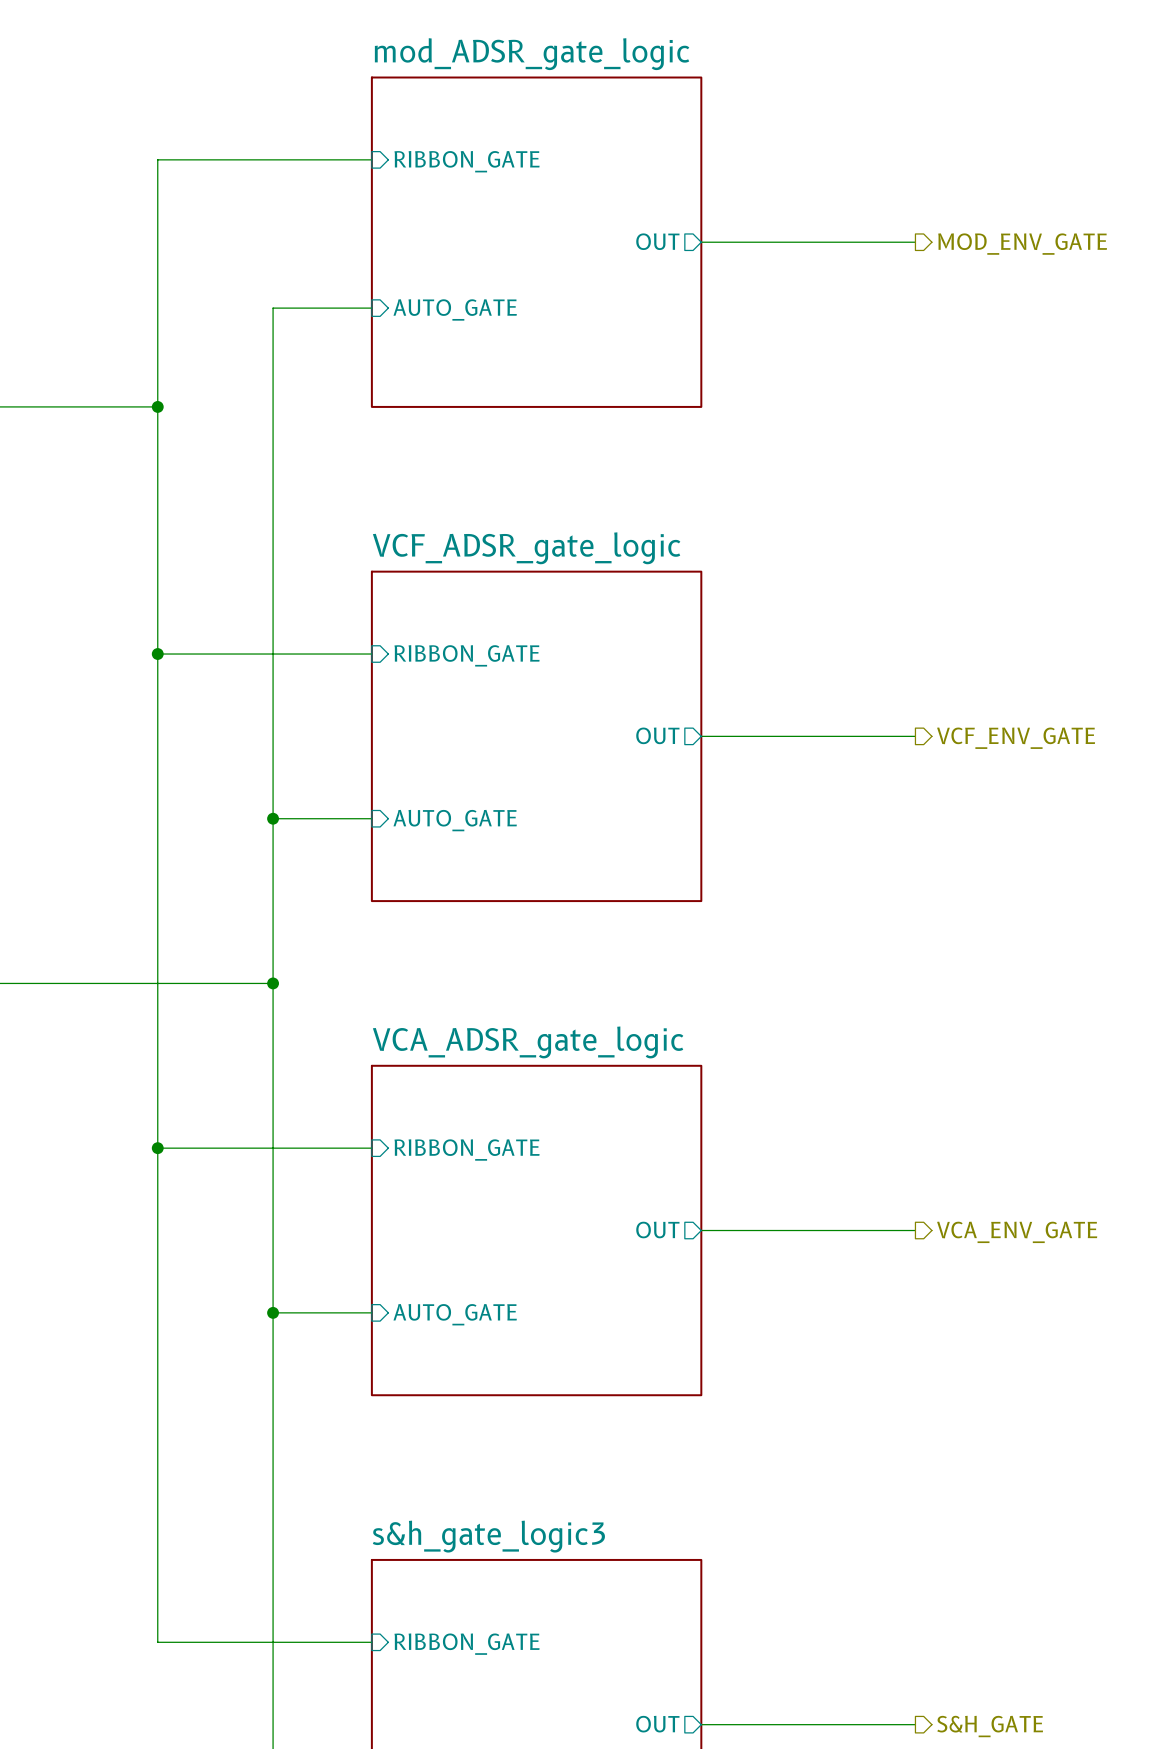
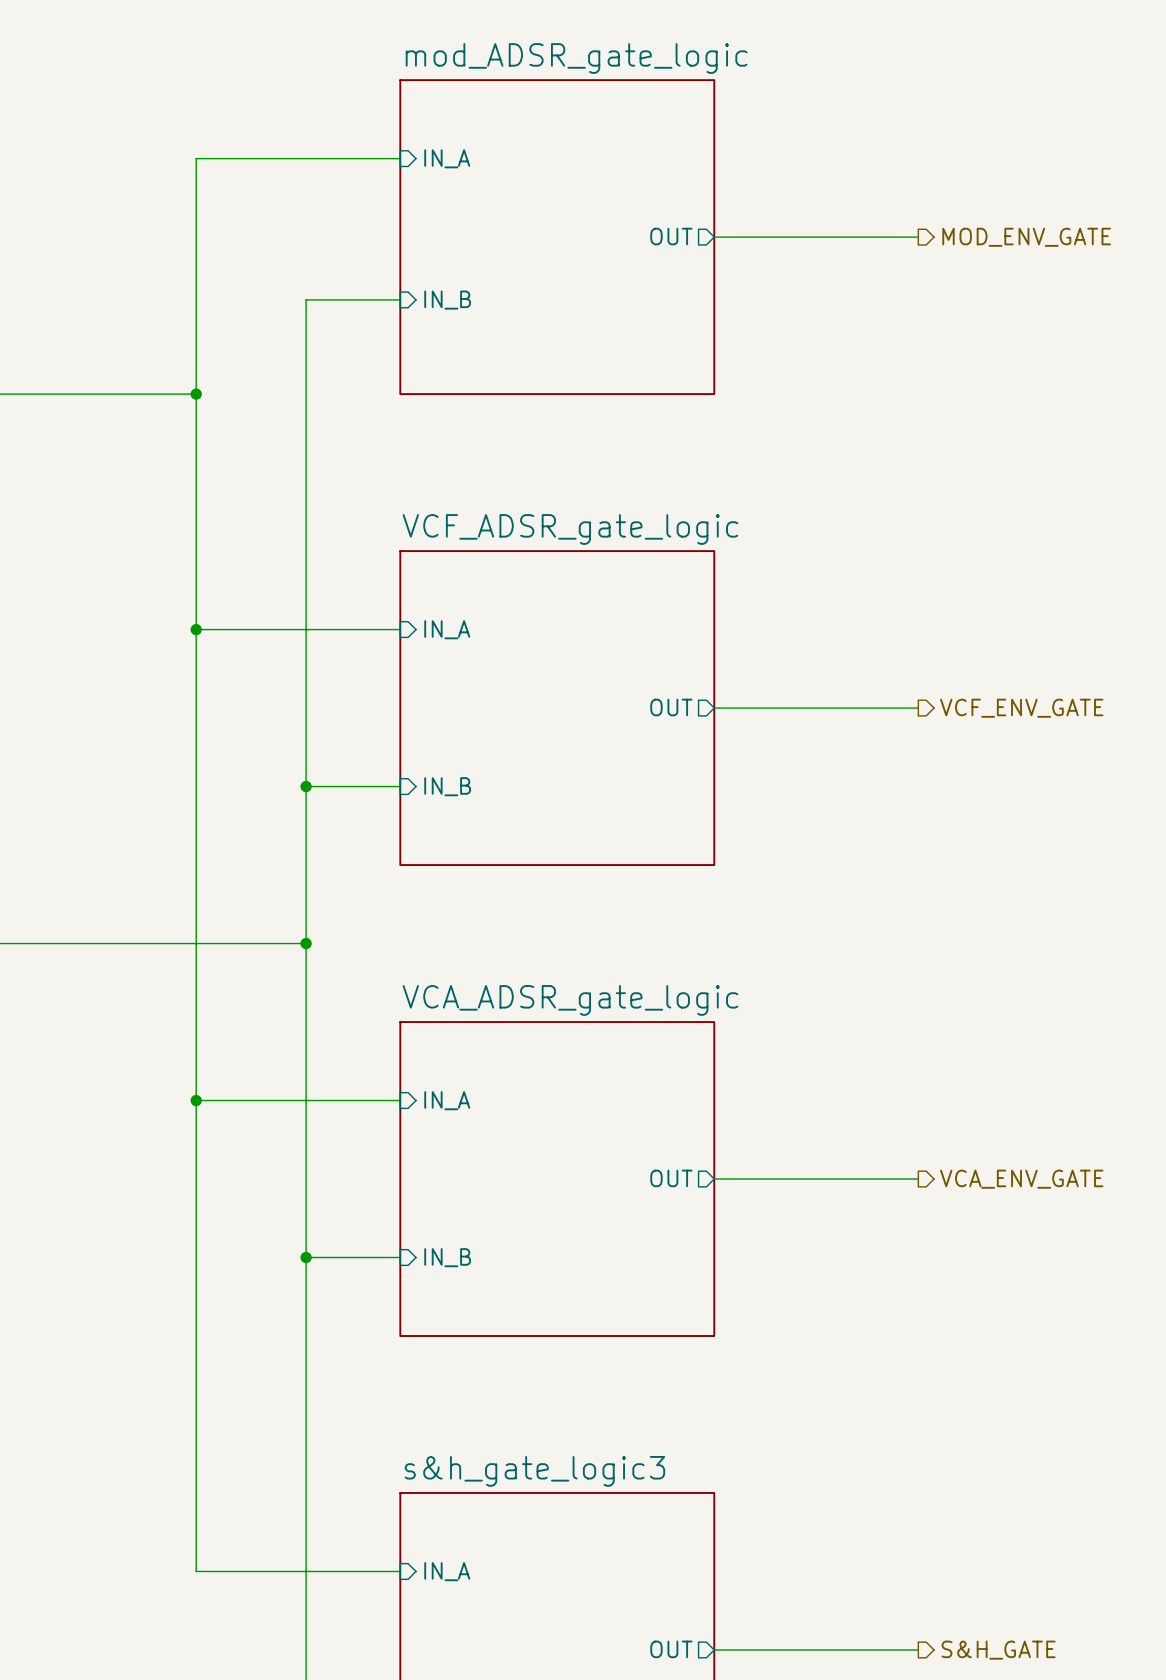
sheet pin: RIBBON_GATE (467, 161) -> IN_A (447, 158)
sheet pin: AUTO_GATE (455, 309) -> IN_B (447, 300)
sheet pin: RIBBON_GATE (467, 655) -> IN_A (447, 629)
sheet pin: AUTO_GATE (455, 820) -> IN_B (447, 786)
sheet pin: RIBBON_GATE (467, 1150) -> IN_A (447, 1100)
sheet pin: AUTO_GATE (455, 1314) -> IN_B (447, 1257)
sheet pin: RIBBON_GATE (467, 1644) -> IN_A (447, 1571)

